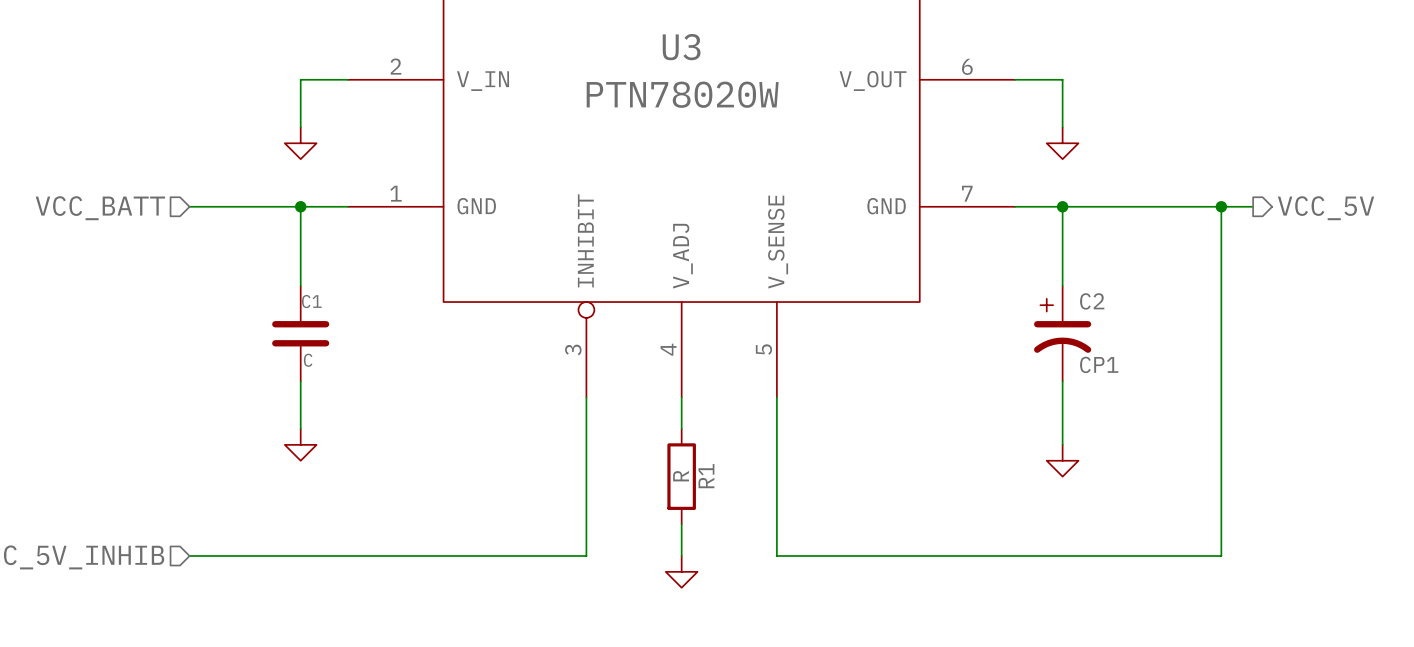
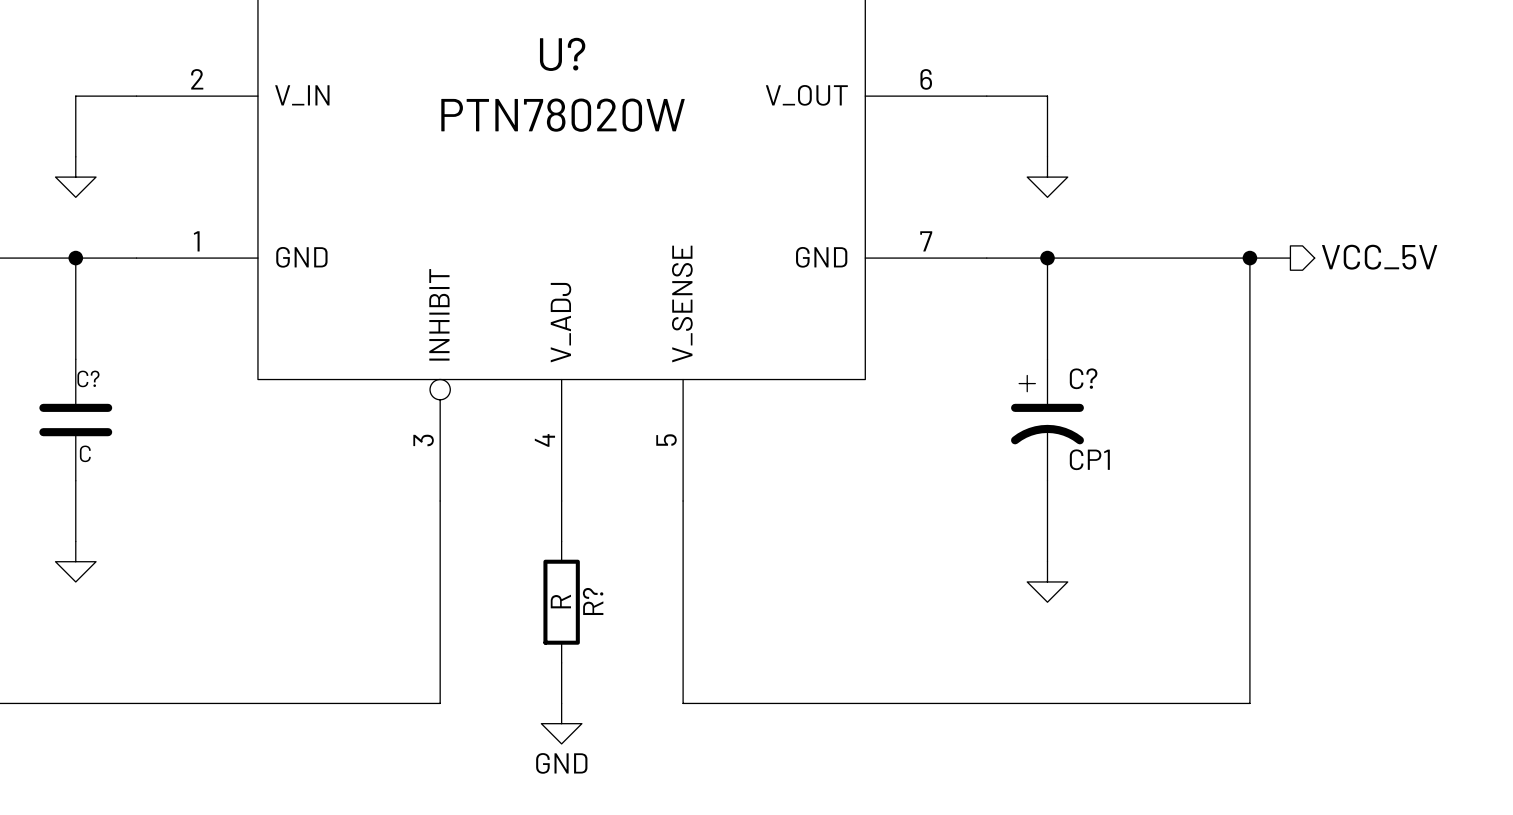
U3 name: U3 (681, 47) -> U? (562, 54)
C1 name: C1 (311, 301) -> C? (88, 378)
C2 name: C2 (1092, 301) -> C? (1083, 378)
R1 name: R1 (706, 476) -> R? (593, 601)
power symbol text: none -> GND (561, 763)

